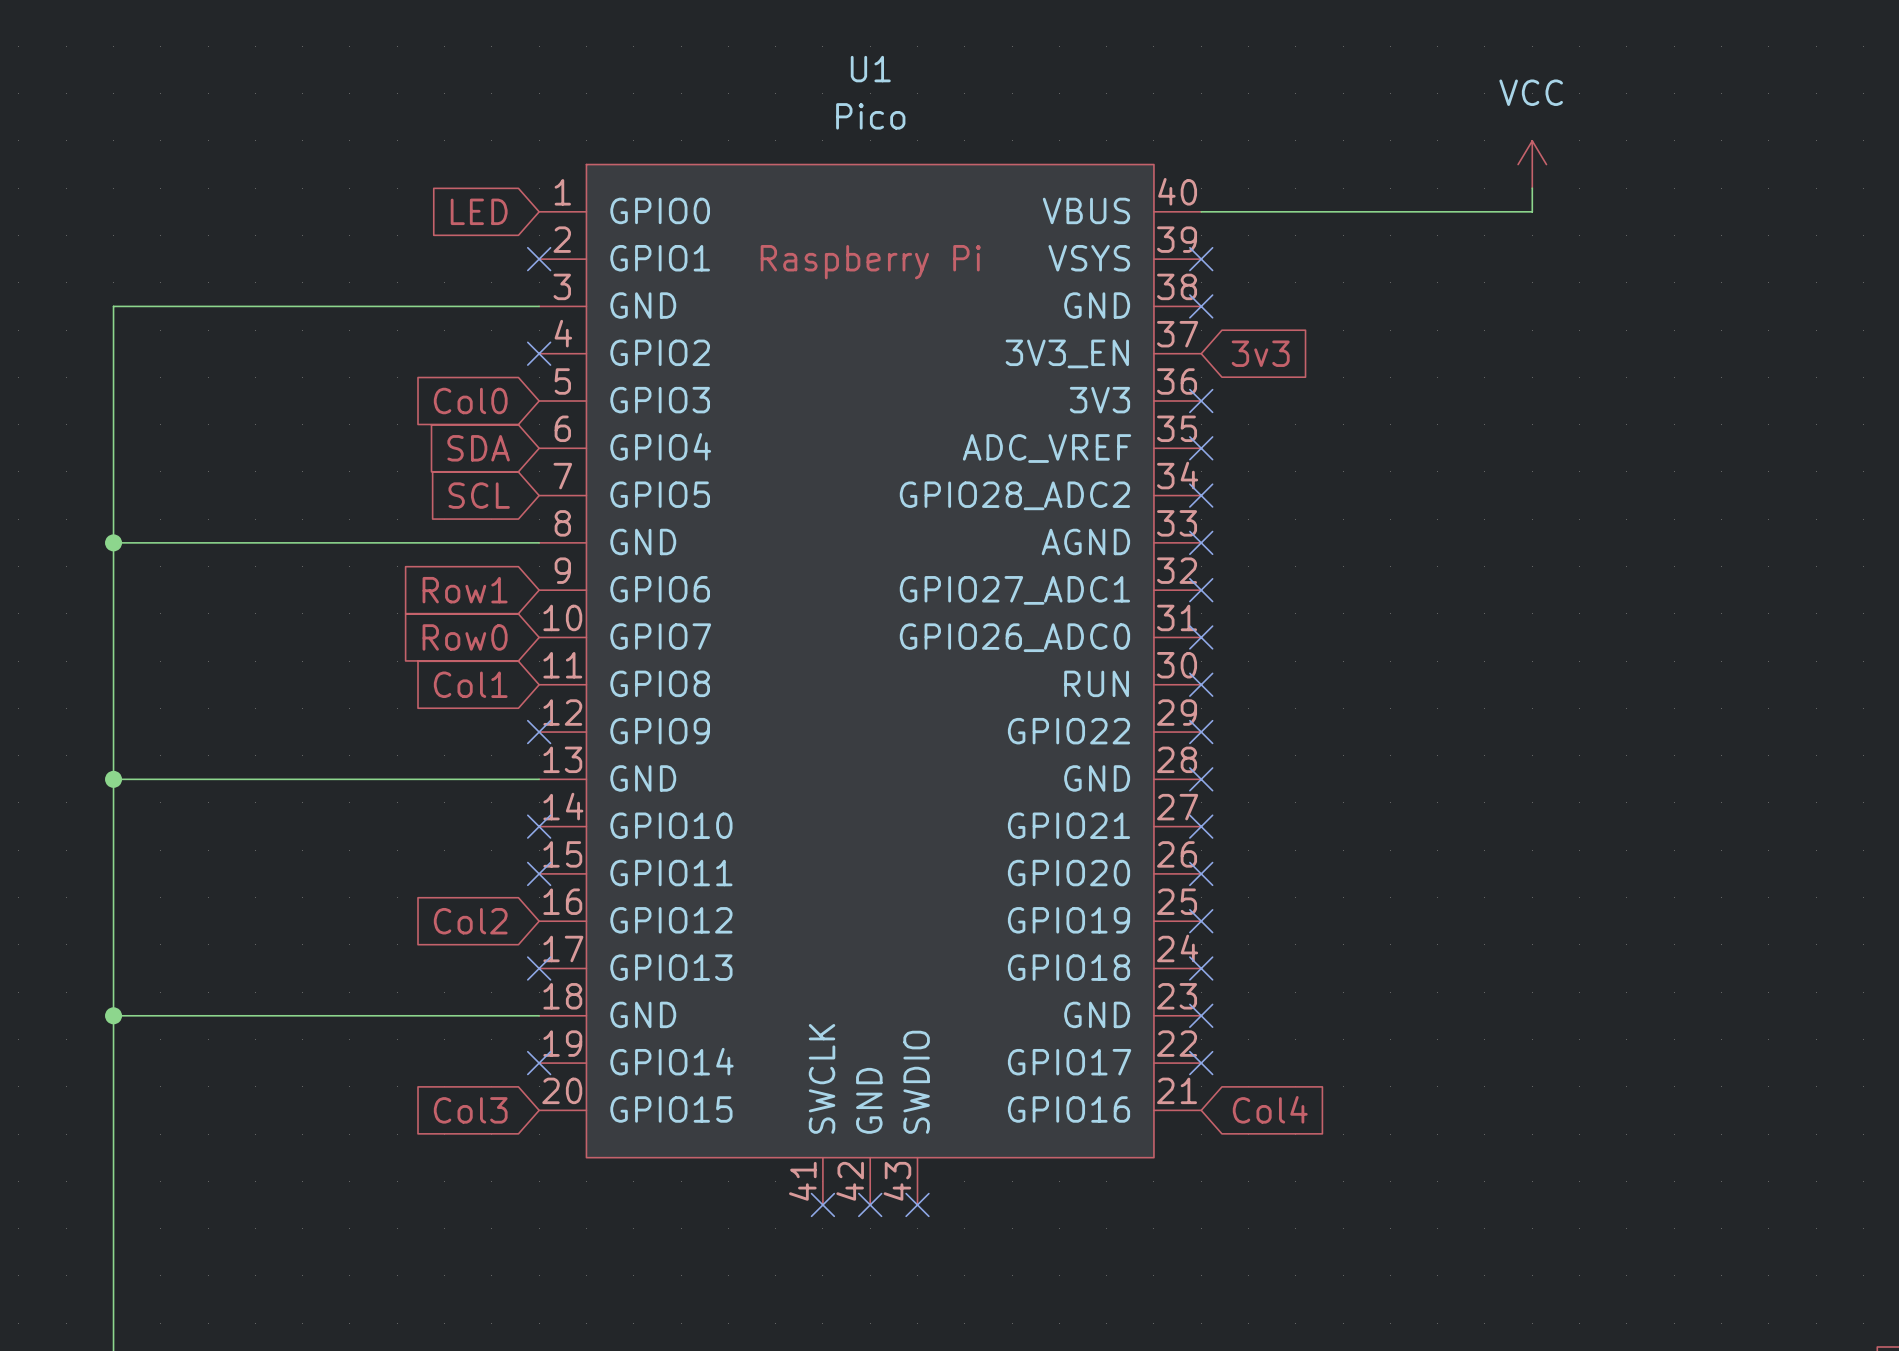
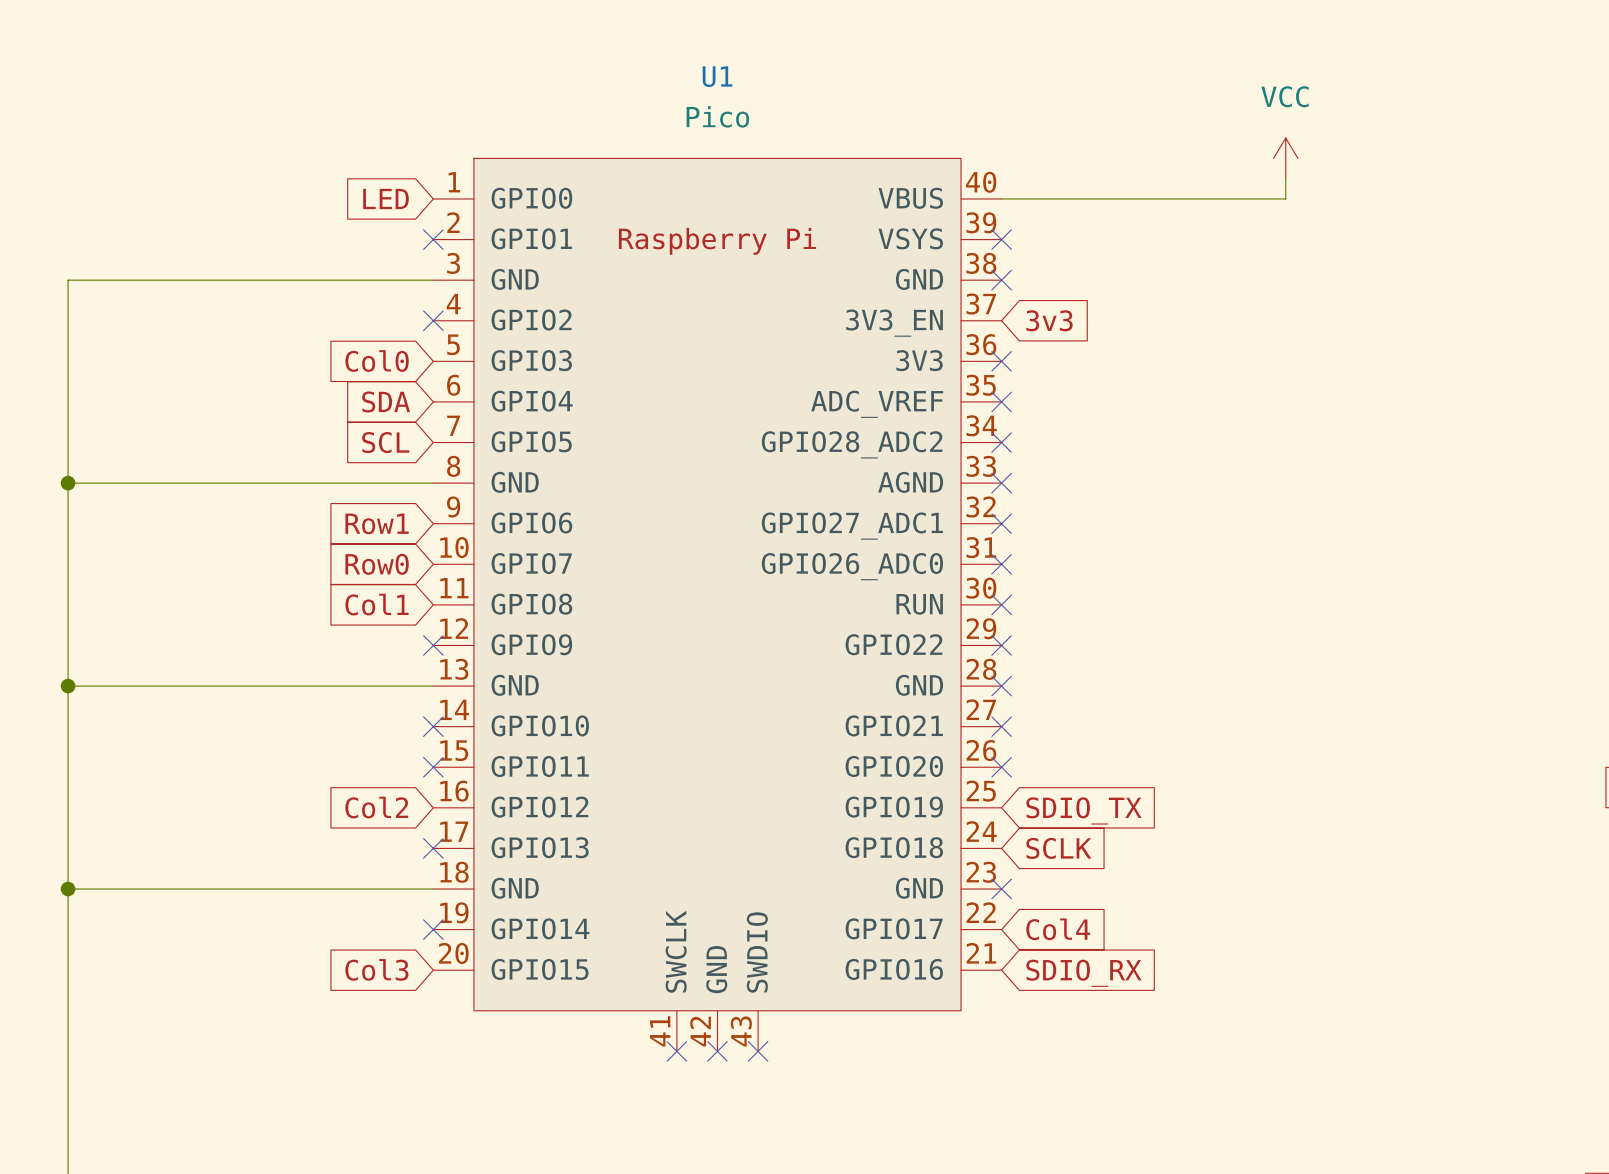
no-connect mark: (1201, 921) -> none
global label: none -> SDIO_TX (1083, 810)
no-connect mark: (1201, 968) -> none
global label: none -> SCLK (1058, 848)
global label: none -> Col4 (1058, 929)
no-connect mark: (1201, 1063) -> none
global label: Col4 (1270, 1109) -> SDIO_RX (1083, 973)

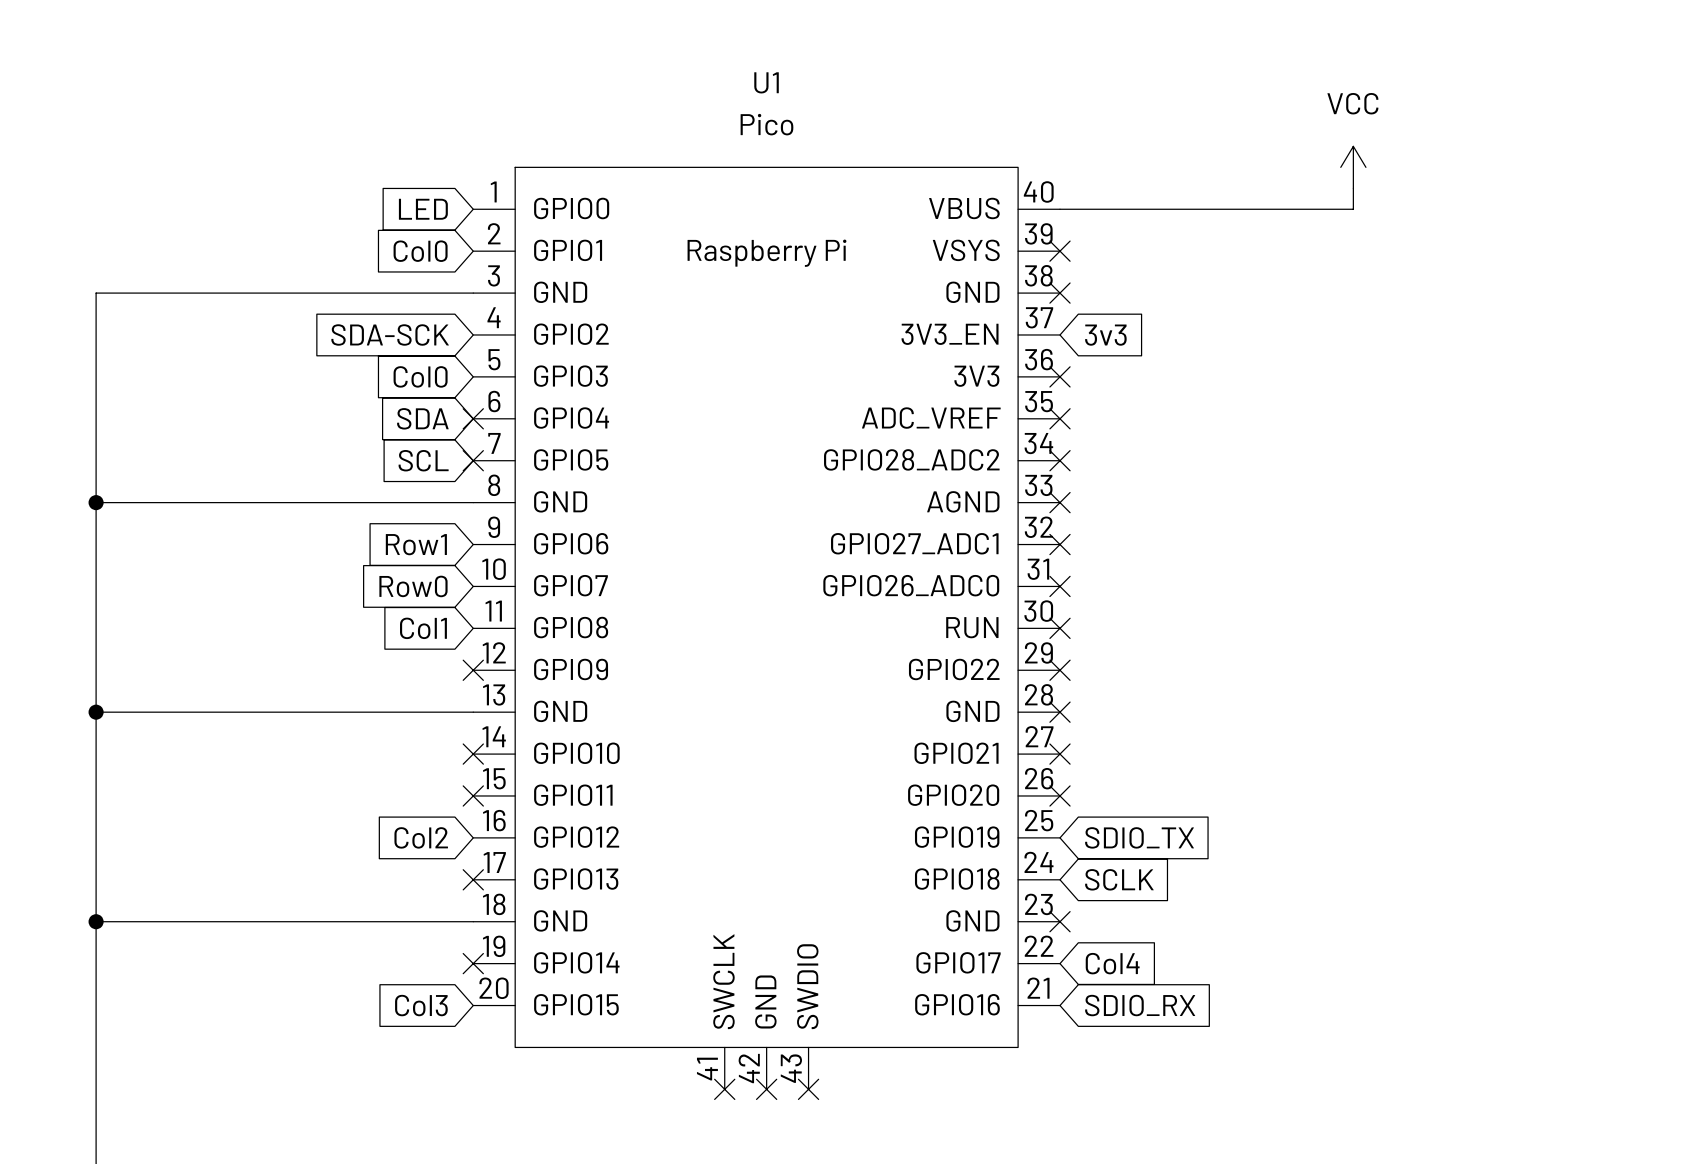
global label: none -> Col0 (420, 251)
no-connect mark: (433, 239) -> none
global label: none -> SDA-SCK (390, 335)
no-connect mark: (433, 320) -> none
no-connect mark: none -> (473, 418)
no-connect mark: none -> (473, 460)

